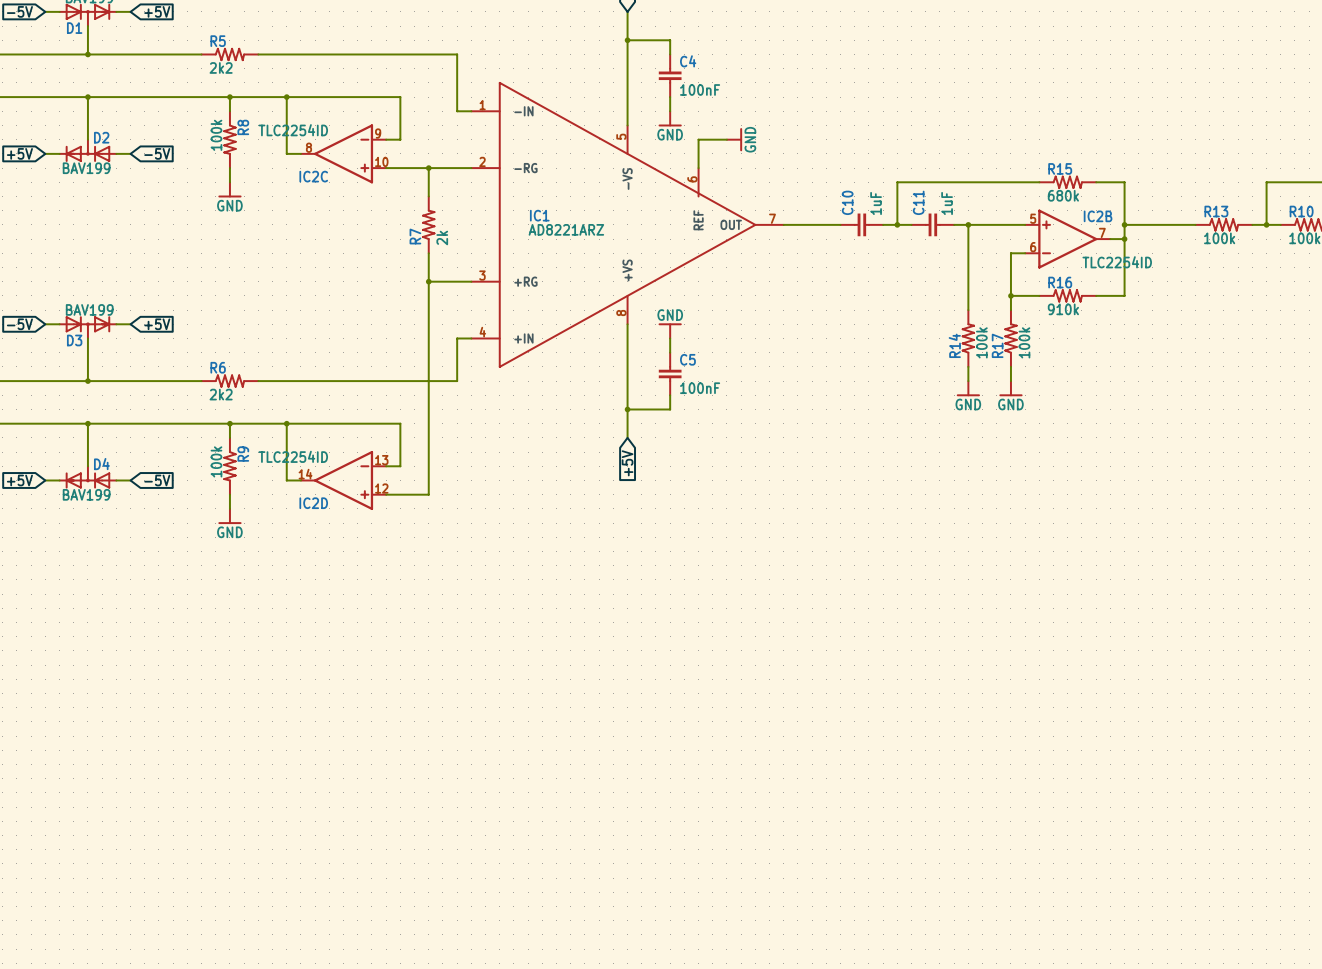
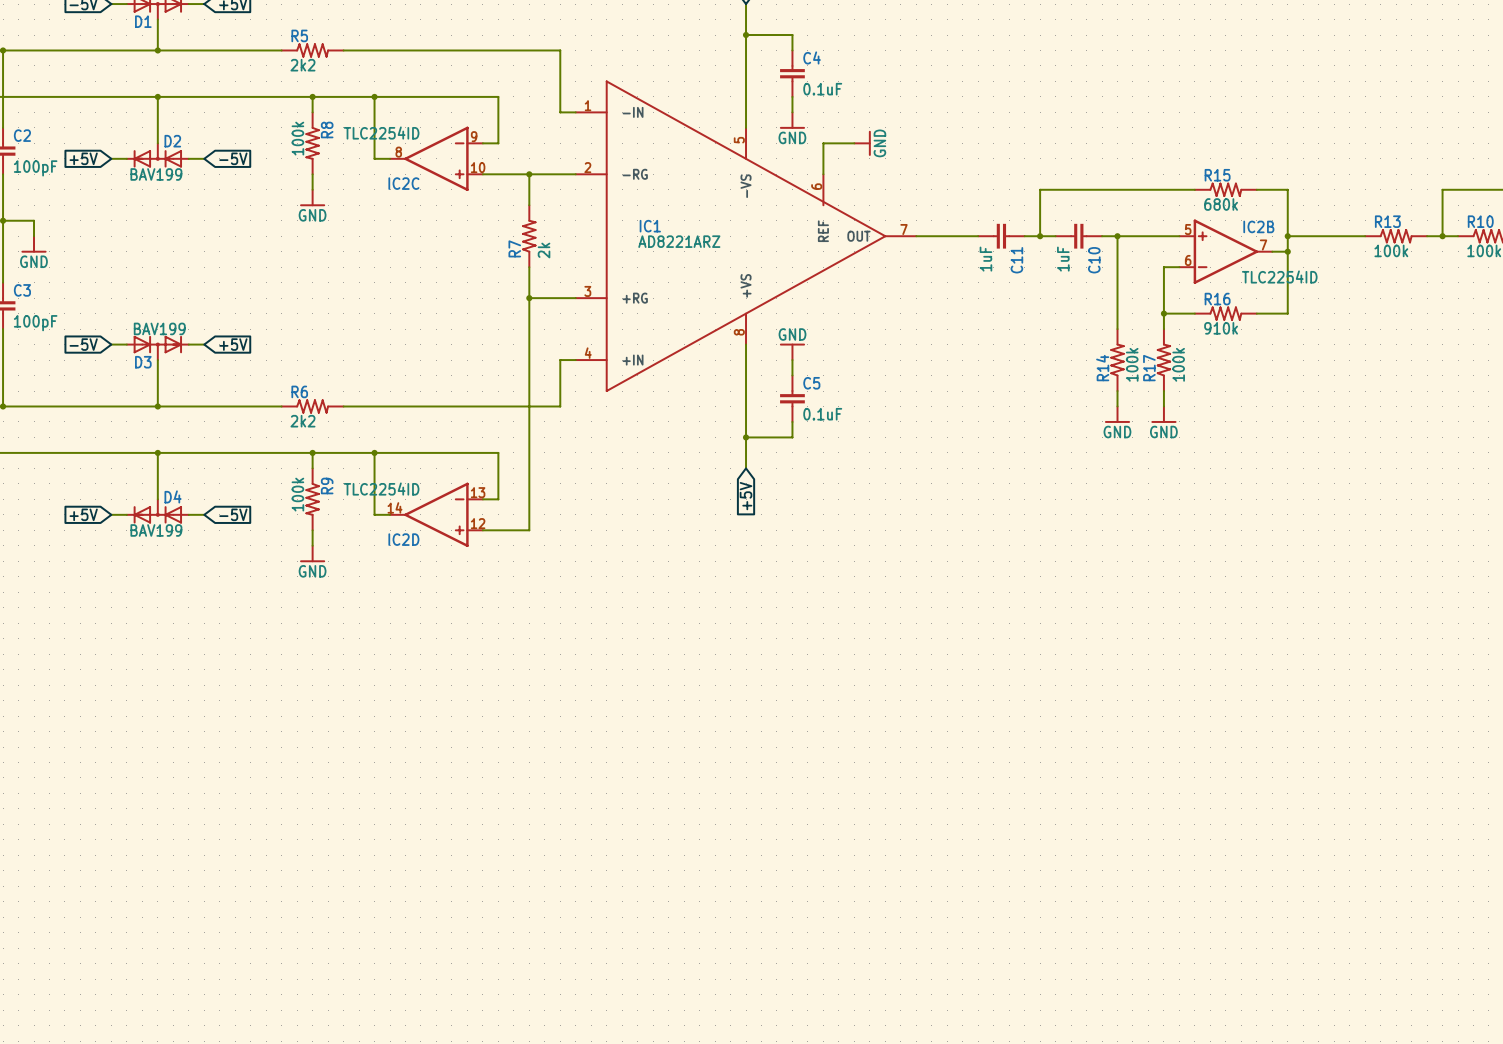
C4 value: 100nF (700, 89) -> 0.1uF (822, 89)
C10 name: C10 (847, 202) -> C11 (1016, 260)
C11 name: C11 (918, 202) -> C10 (1094, 260)
C10 value position: 1uF (876, 203) -> 1uF (985, 259)
C11 value position: 1uF (947, 203) -> 1uF (1063, 259)
C5 value: 100nF (700, 388) -> 0.1uF (822, 414)

